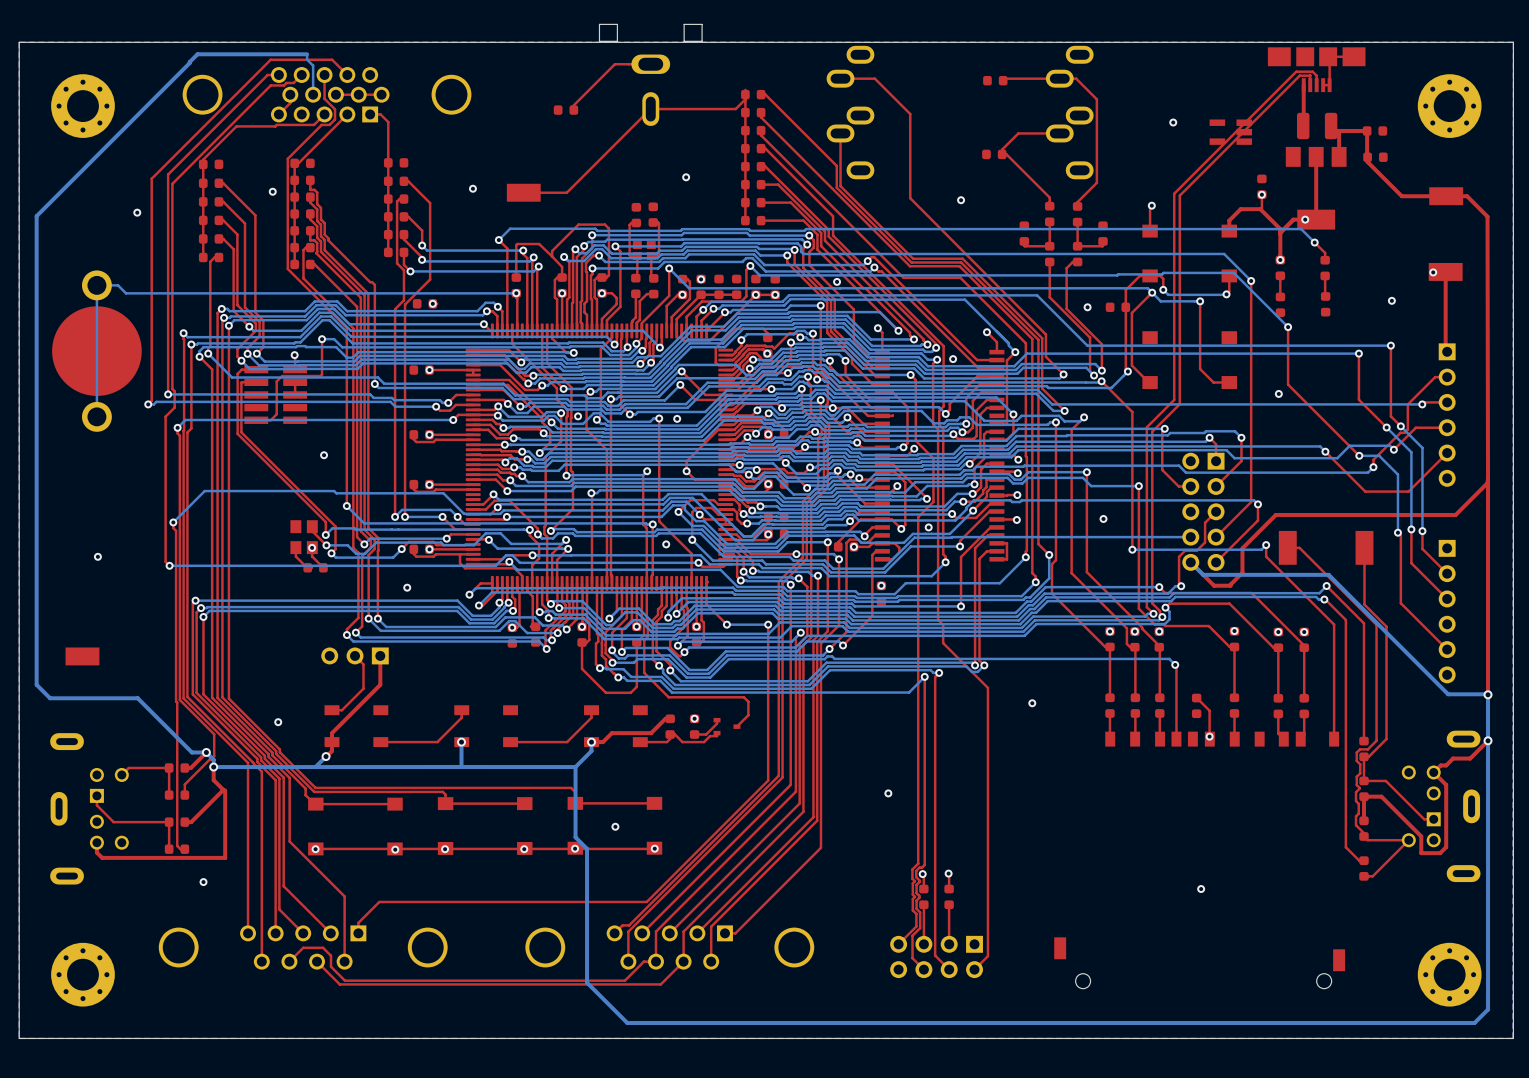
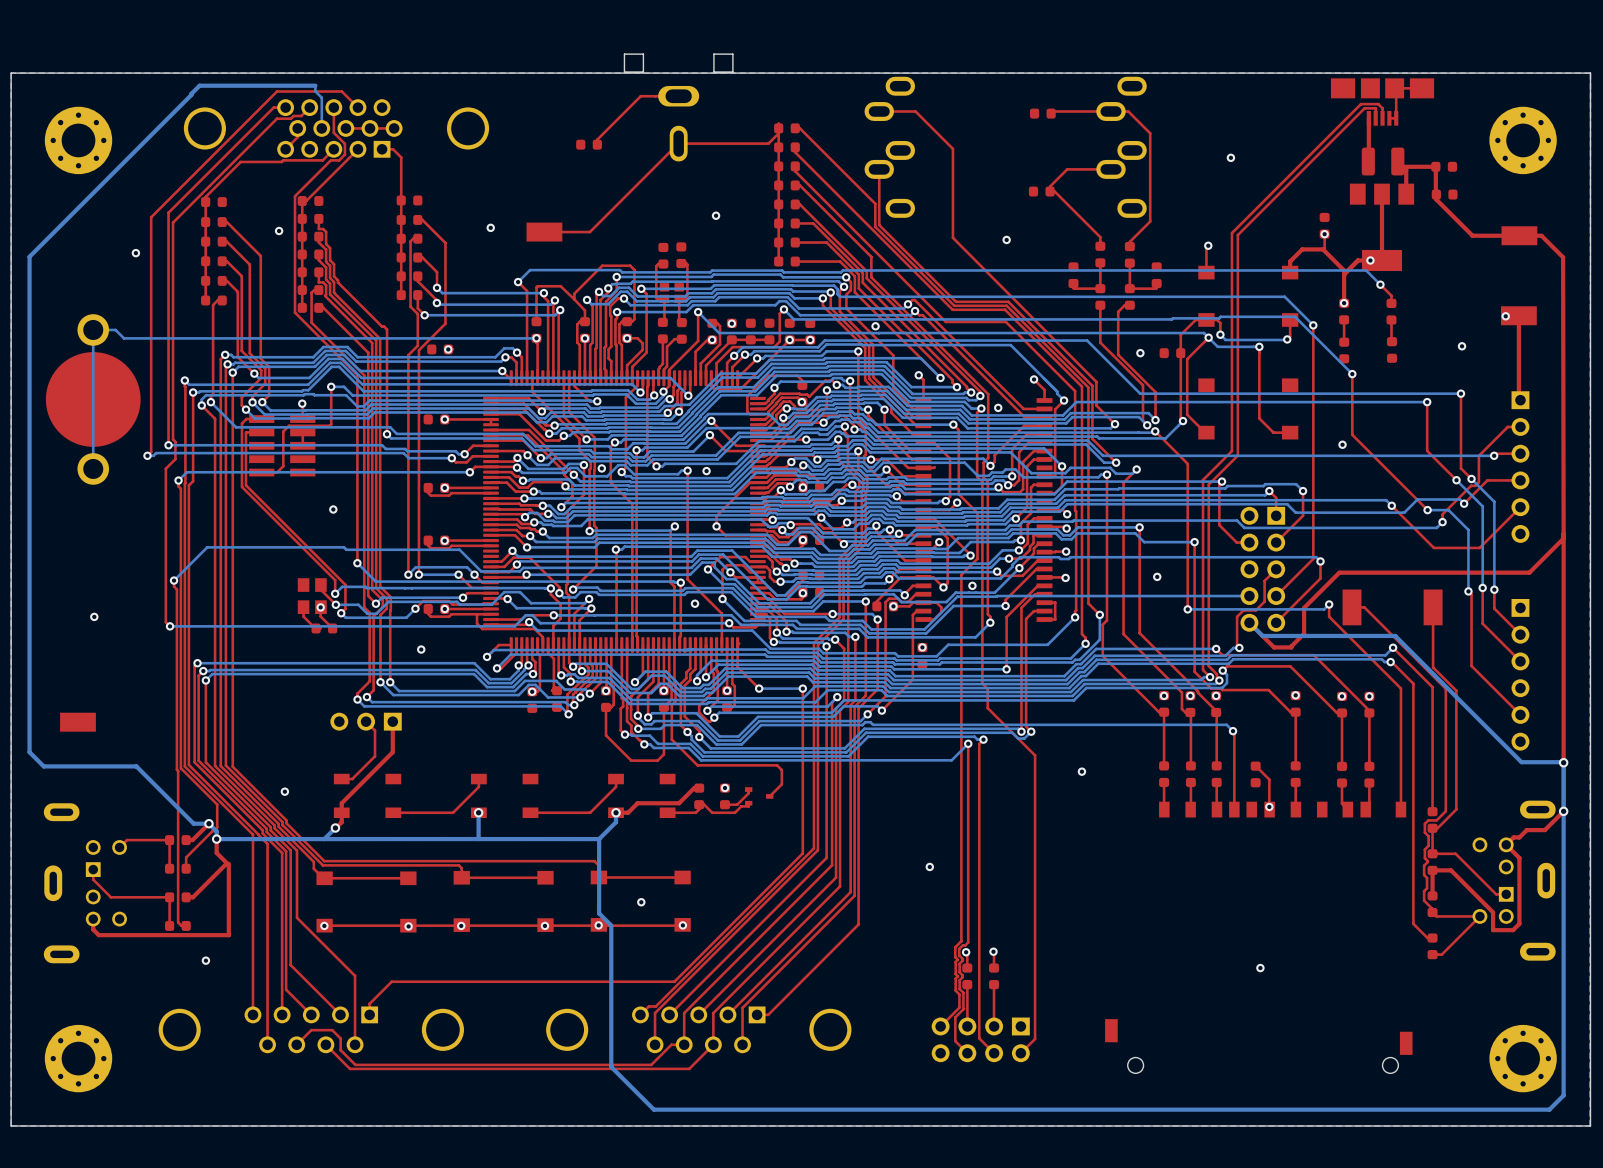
part: (1230, 132) -> none

